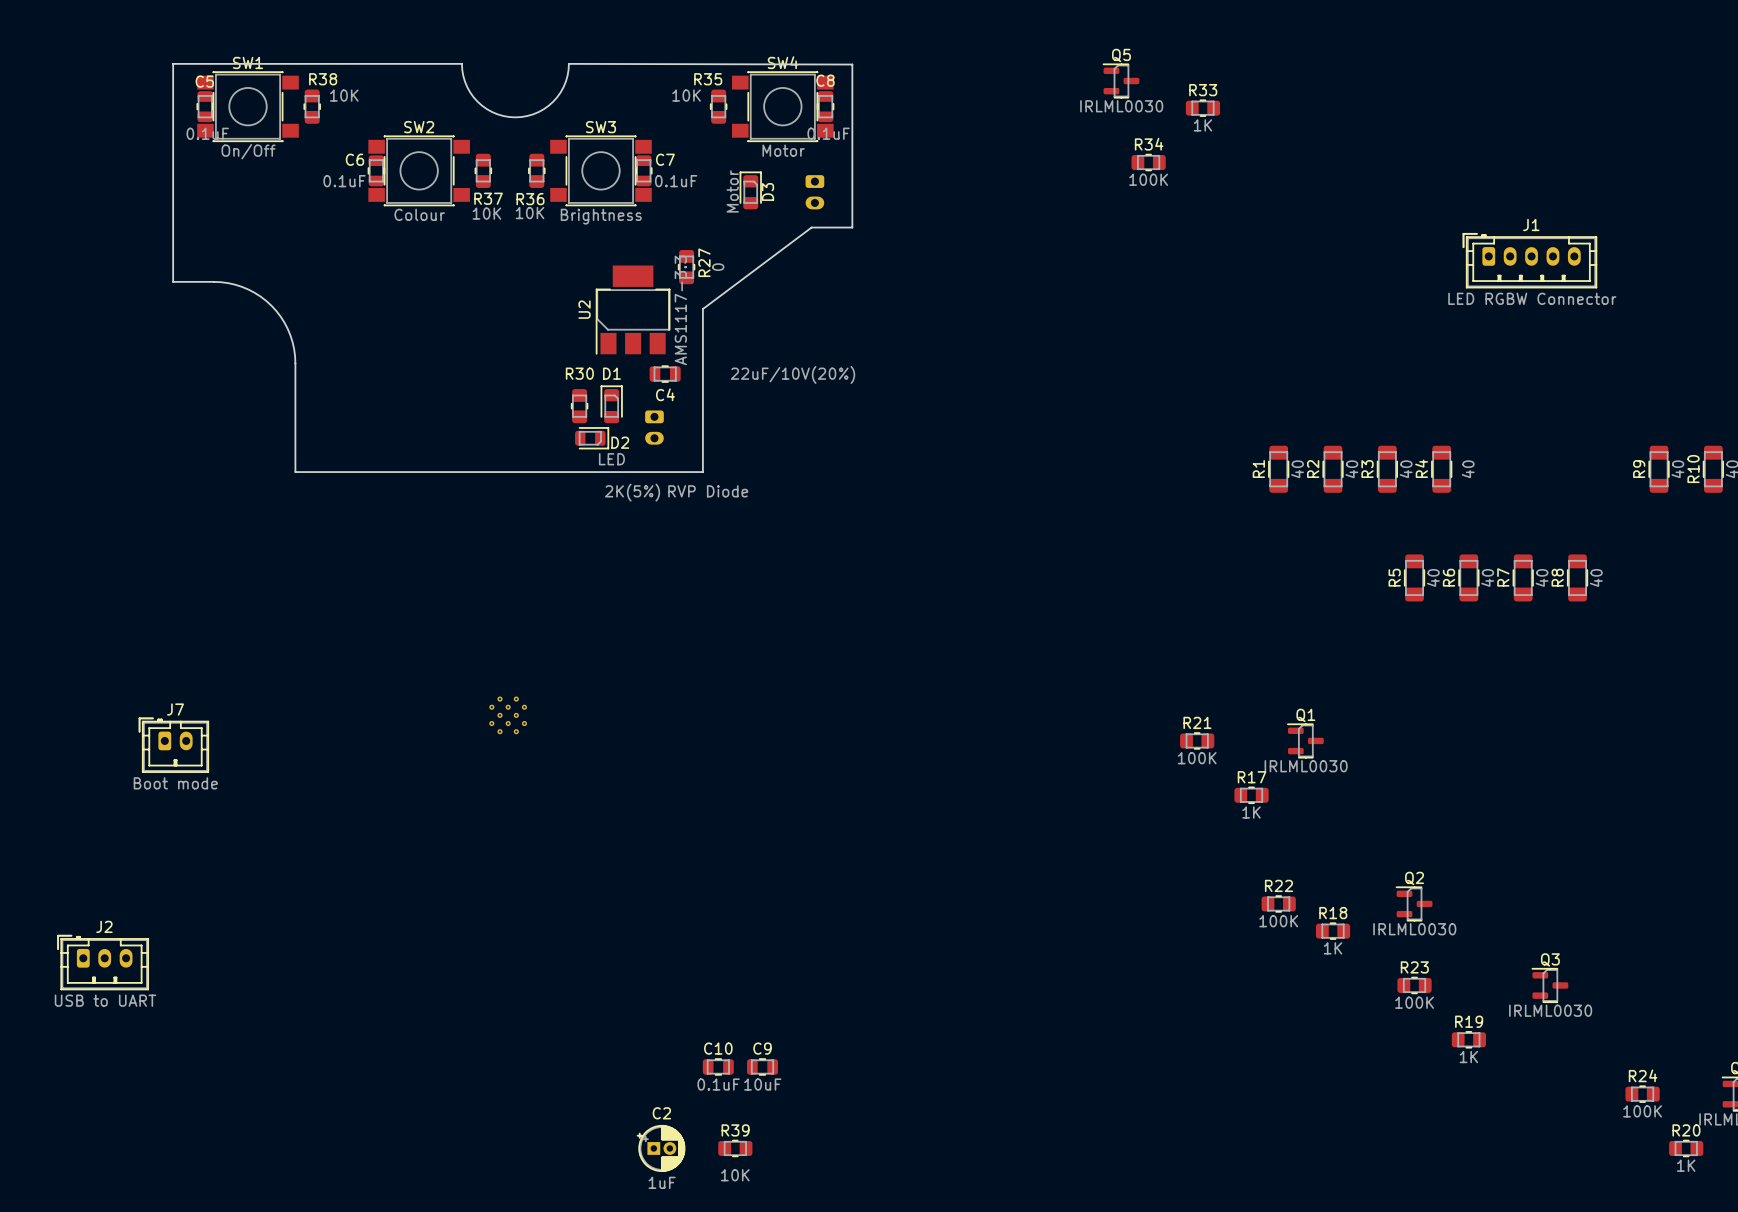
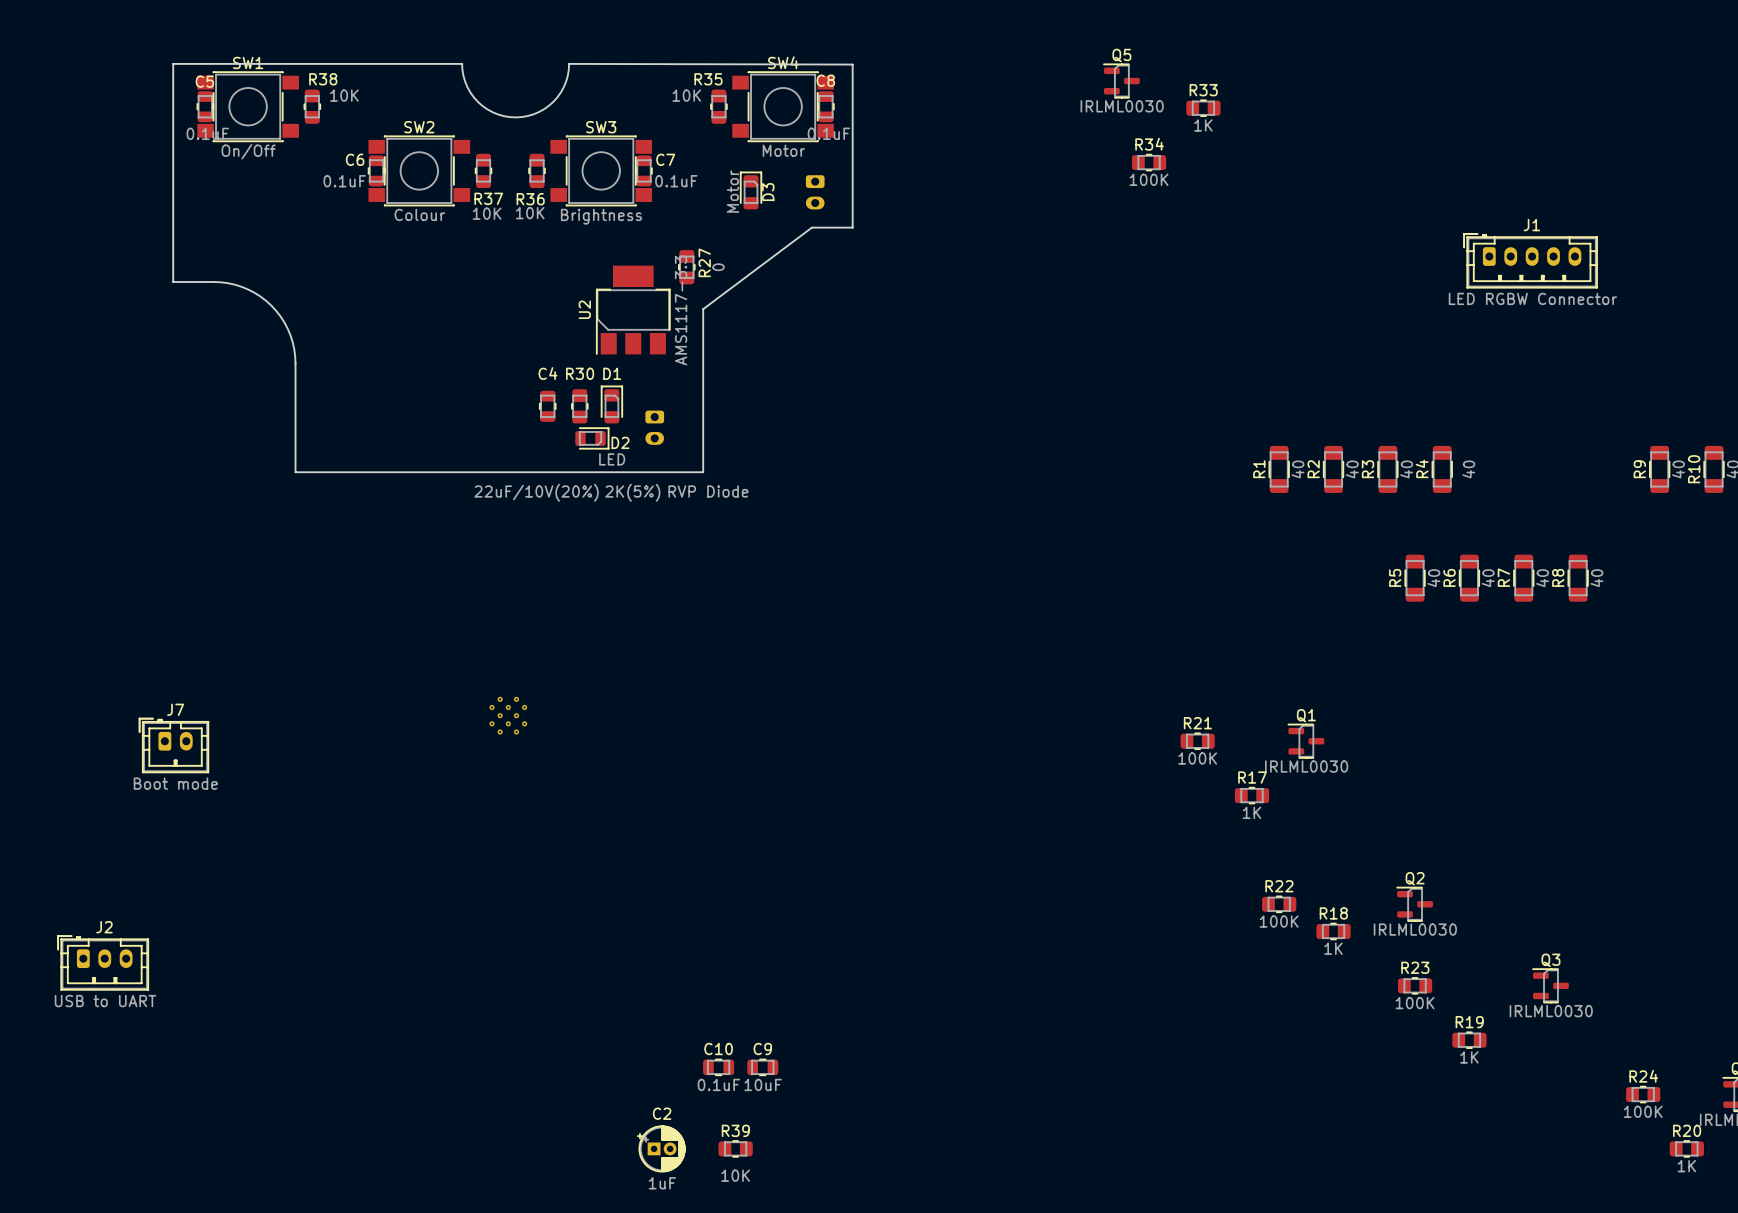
C4 rotation: 0° (665, 374) -> 90° clockwise (547, 406)
C4 position: (665, 374) -> (547, 406)
C4 value position: 22uF/10V(20%) (793, 374) -> 22uF/10V(20%) (536, 492)
C4 name position: C4 (665, 394) -> C4 (547, 373)

